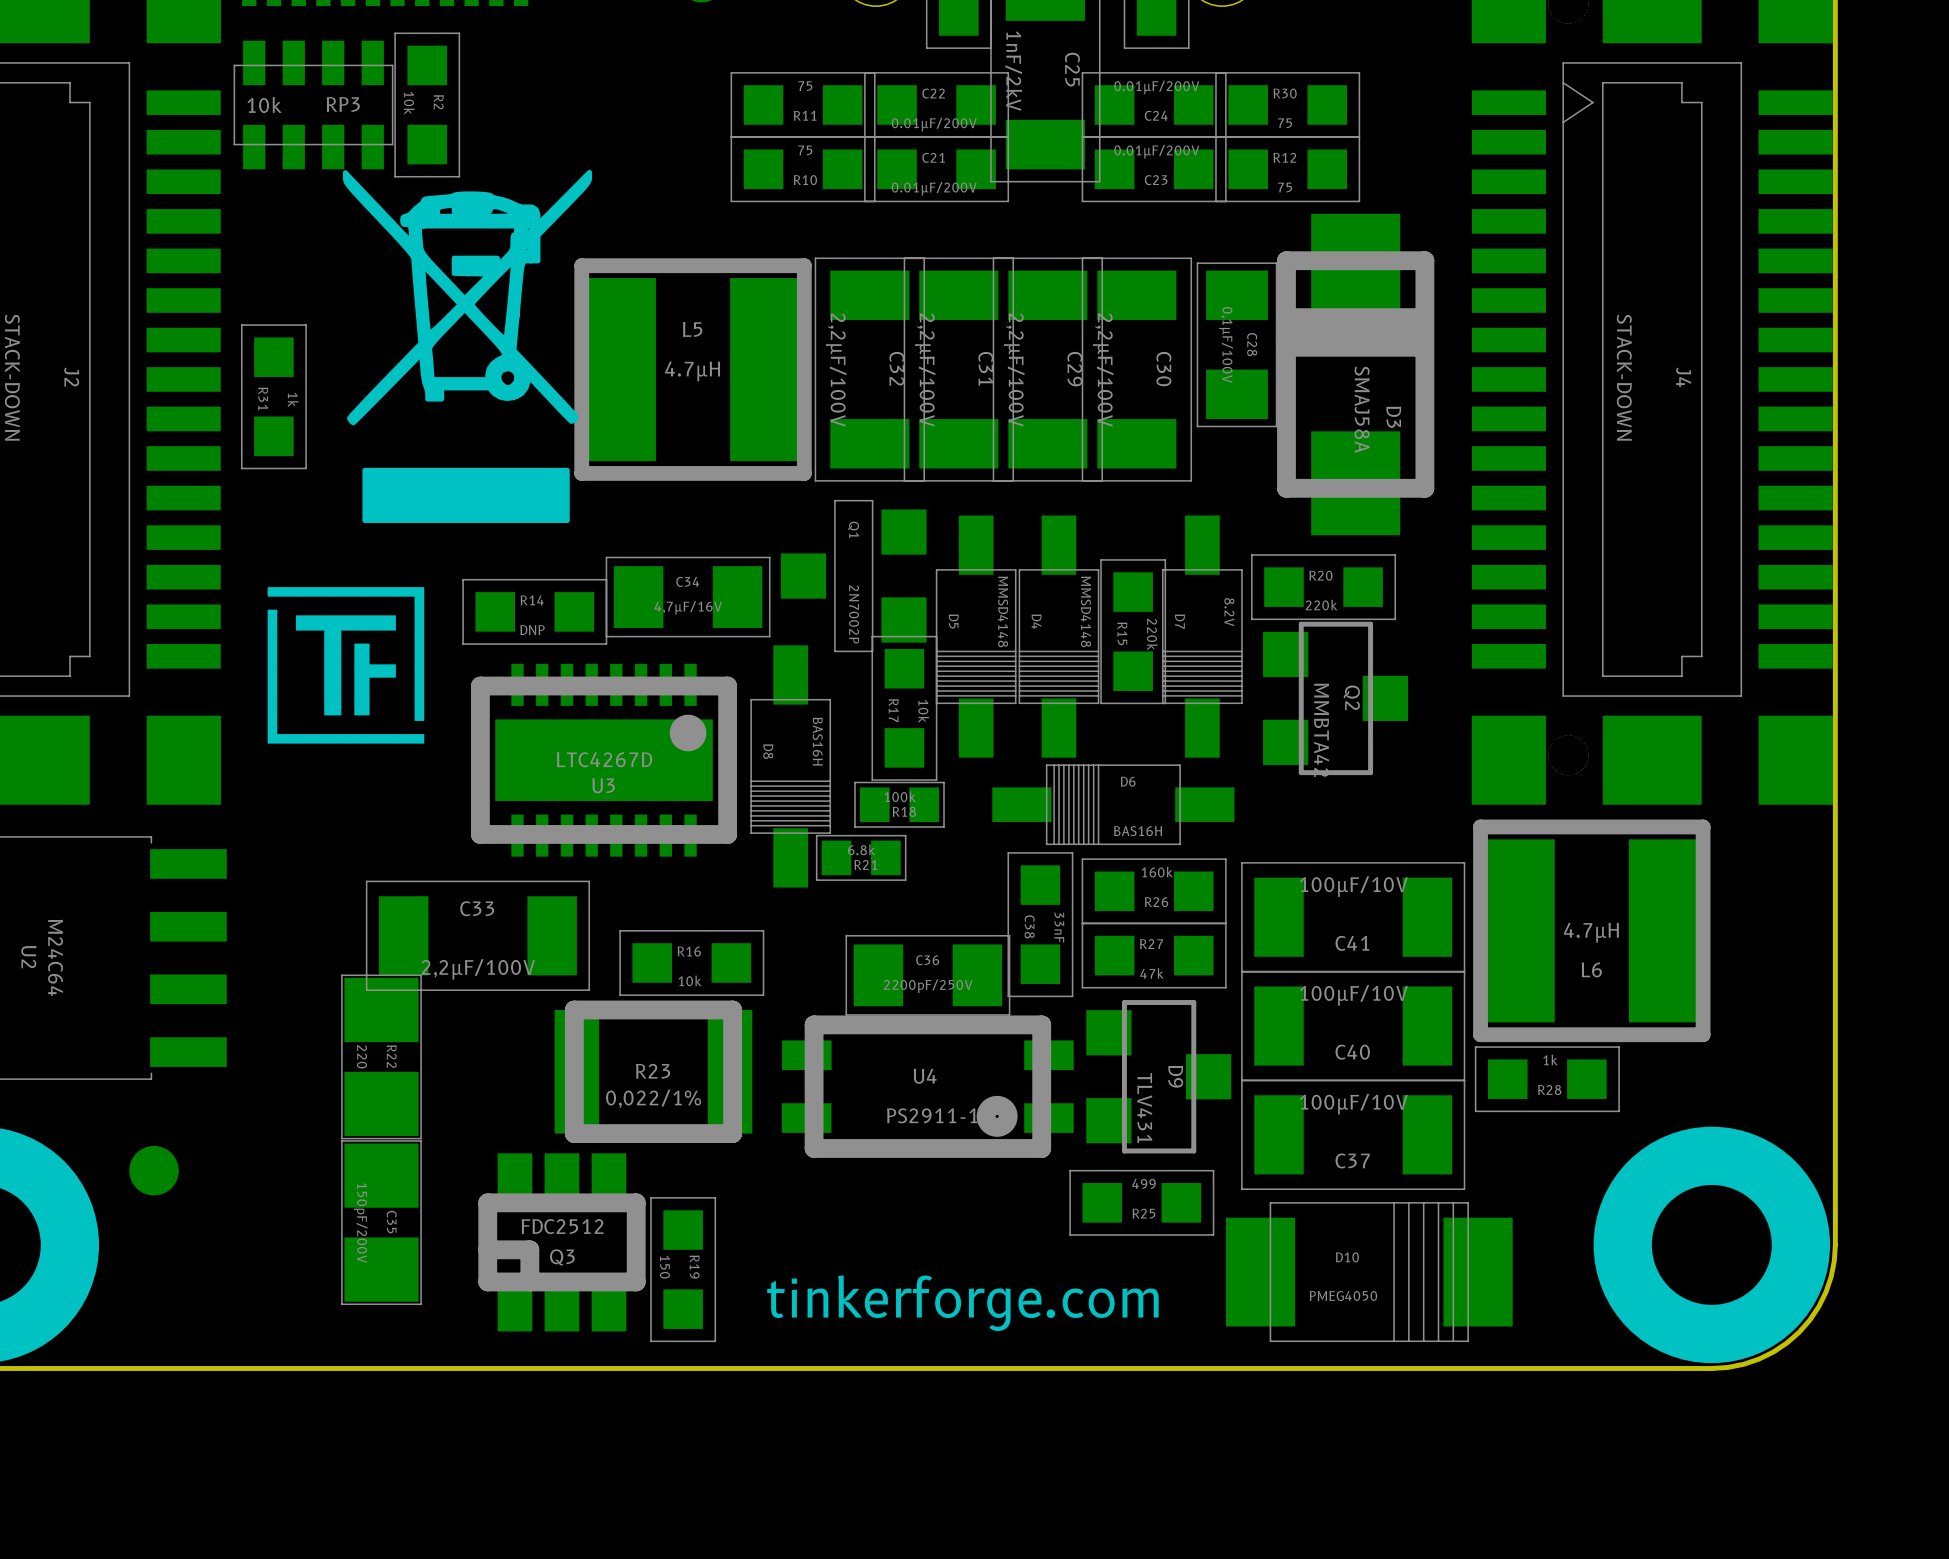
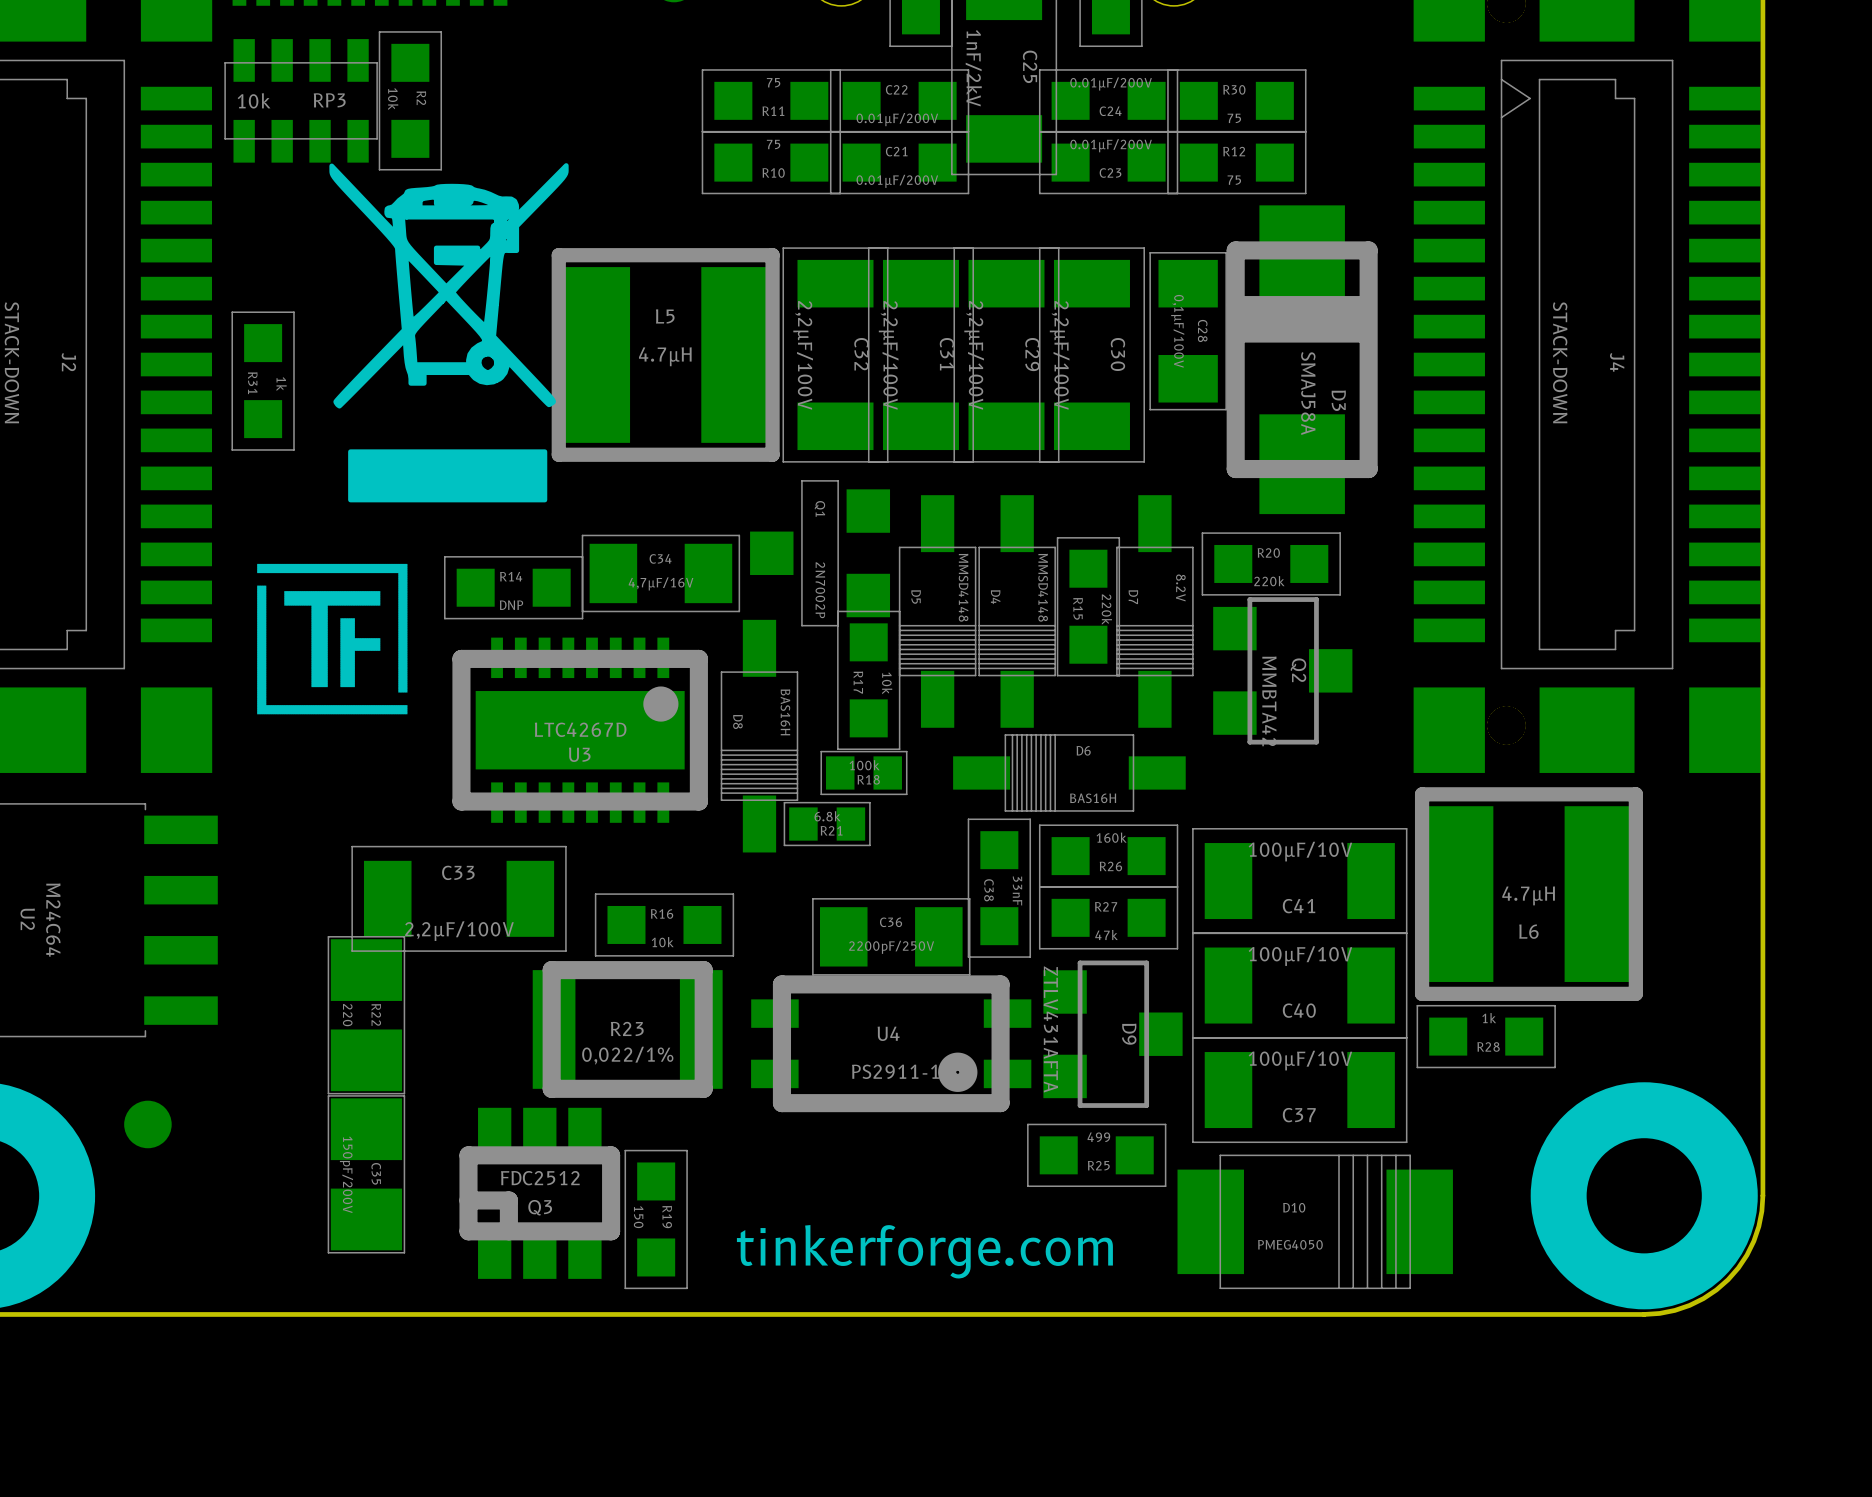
D9 value: TLV431 (1144, 1108) -> ZTLV431AFTA (1050, 1029)

